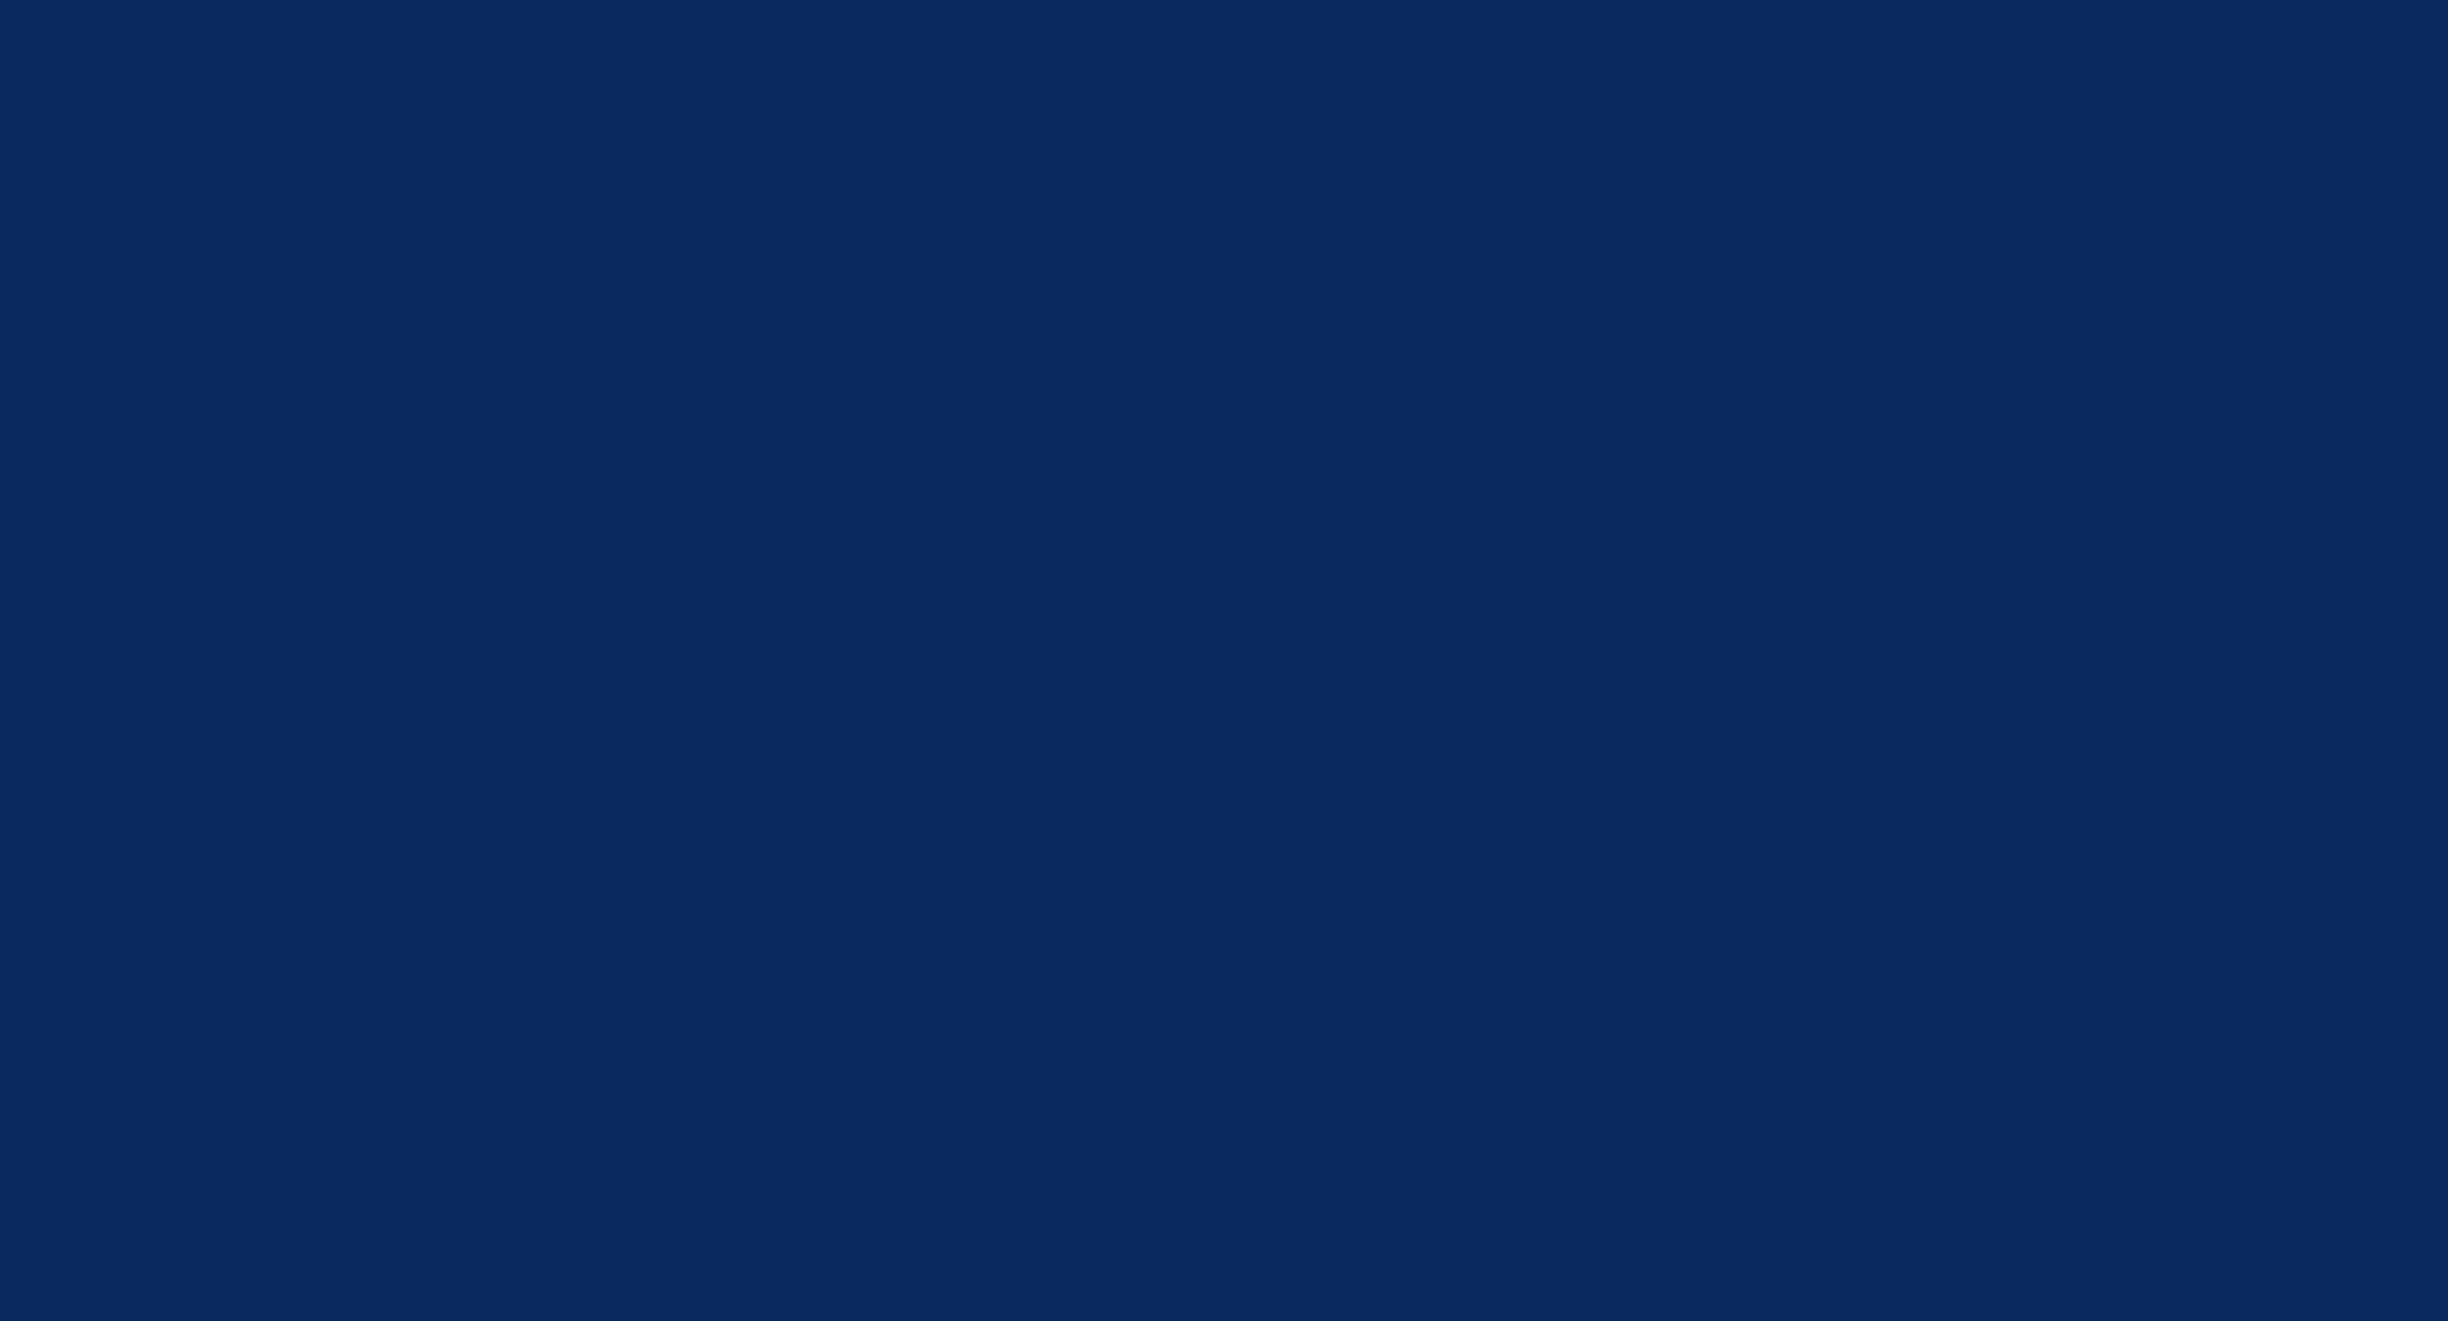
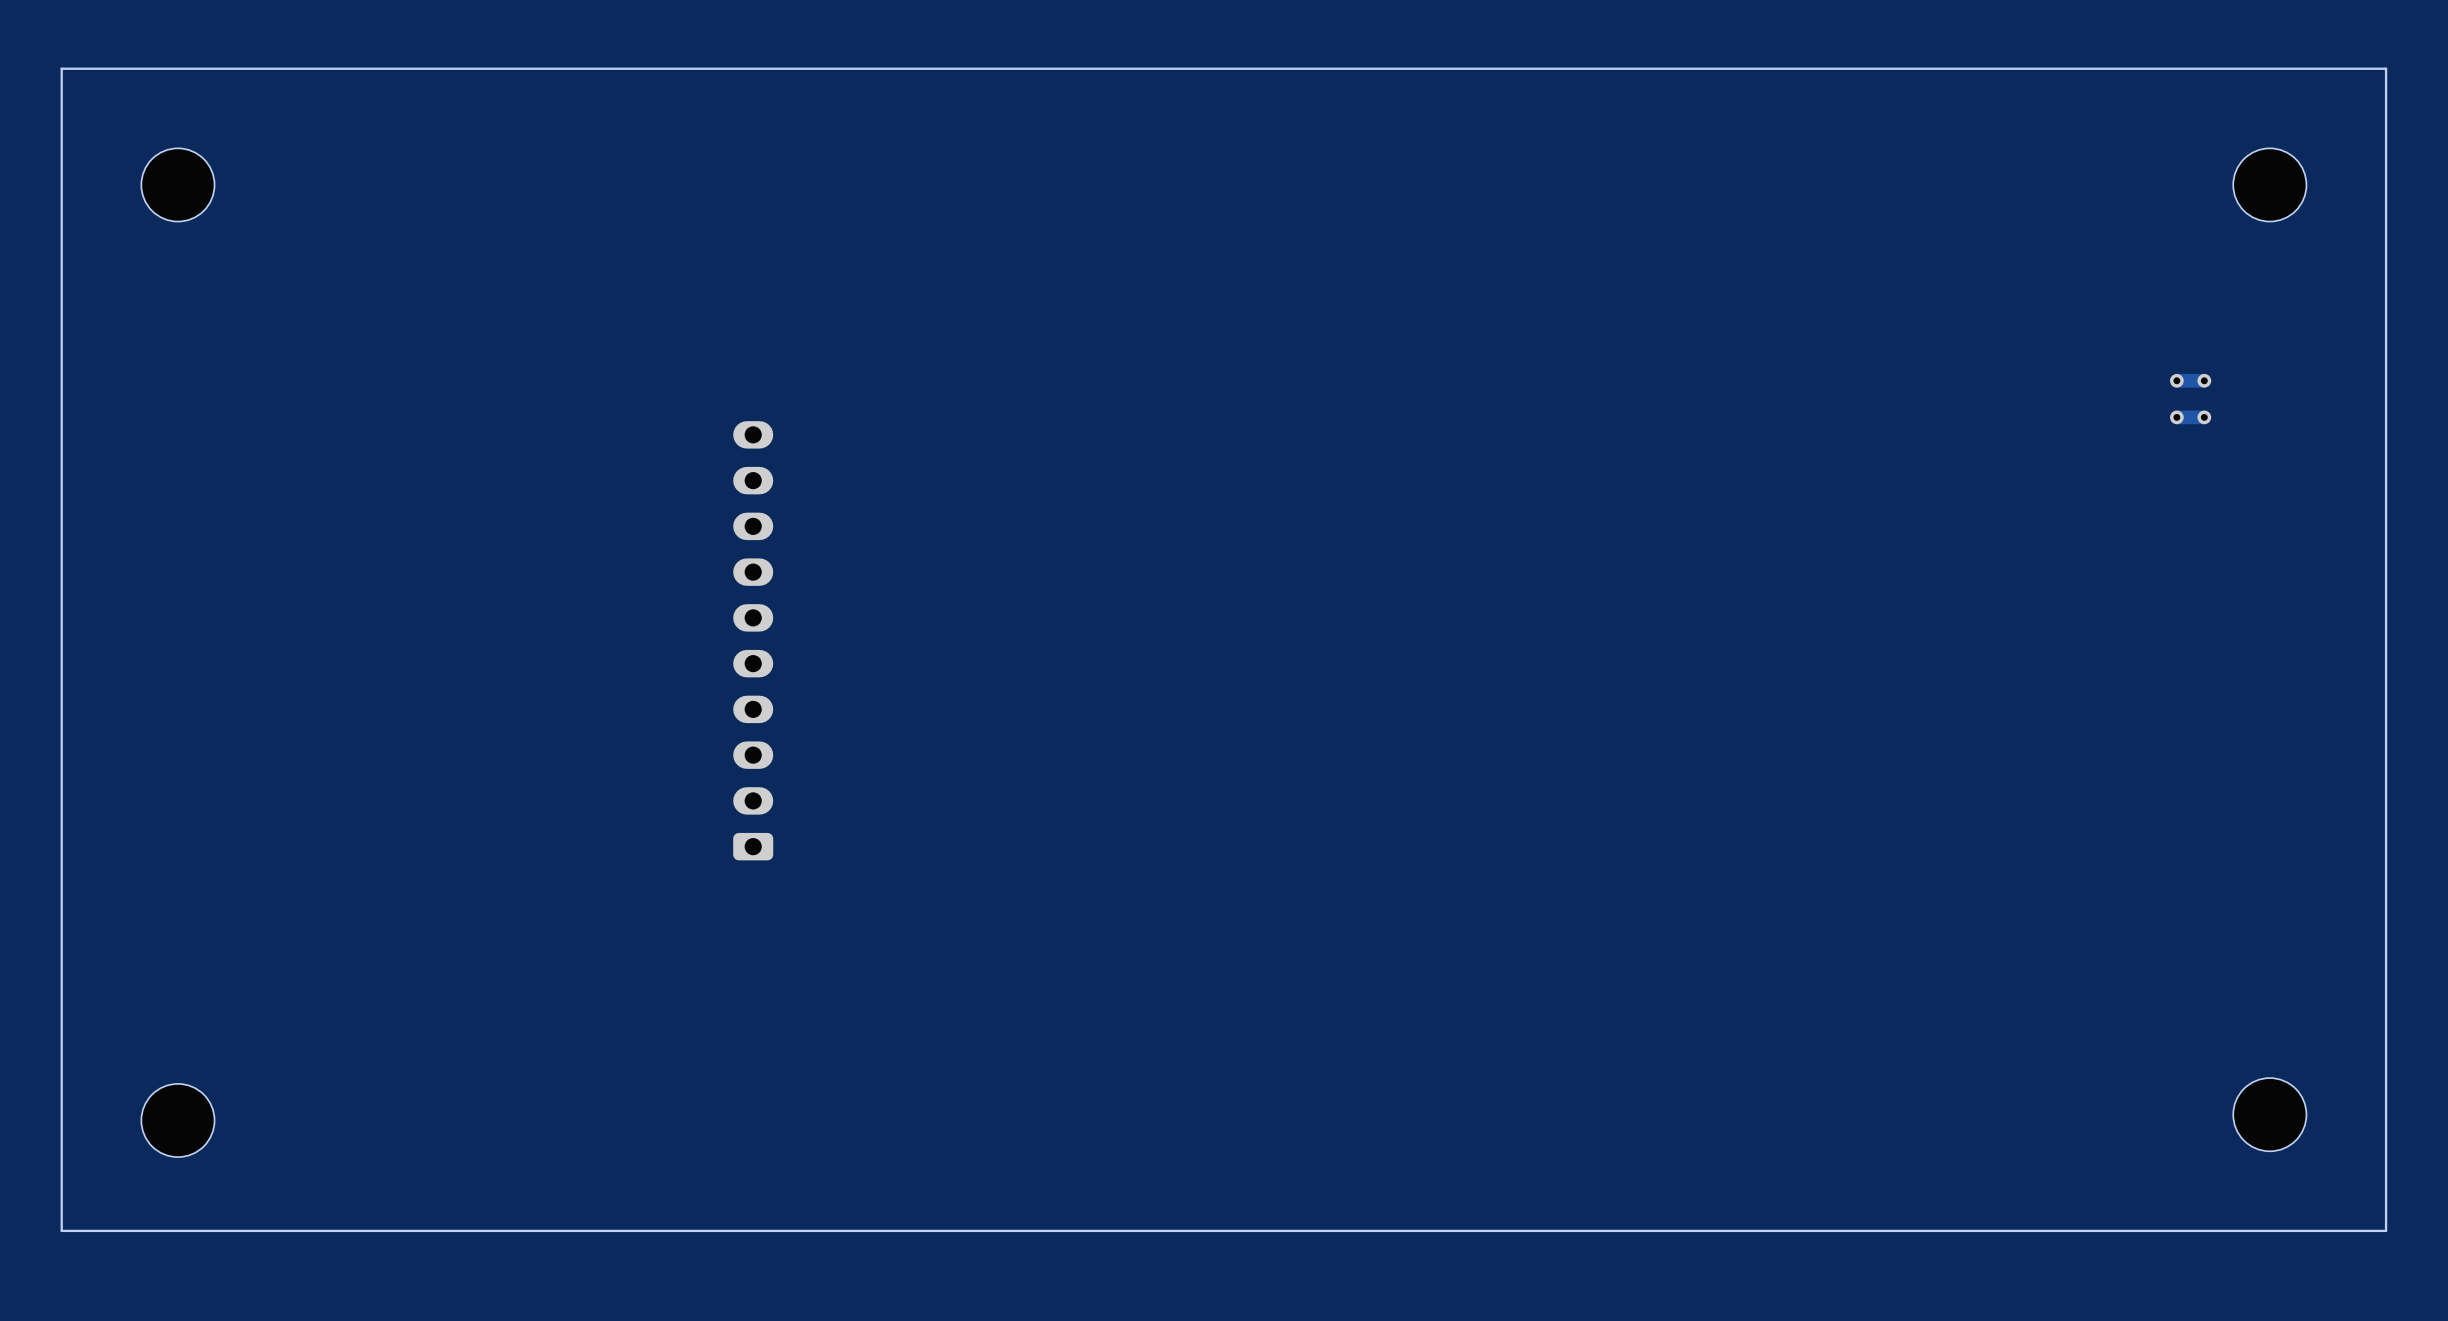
board edge: none -> (2386, 68) (61, 68) (61, 1230) (2386, 1230) (2386, 68)
part: none -> (177, 184)
part: none -> (2269, 184)
part: none -> (2190, 380)
part: none -> (2190, 417)
part: none -> (753, 640)
part: none -> (2269, 1114)
part: none -> (177, 1120)

